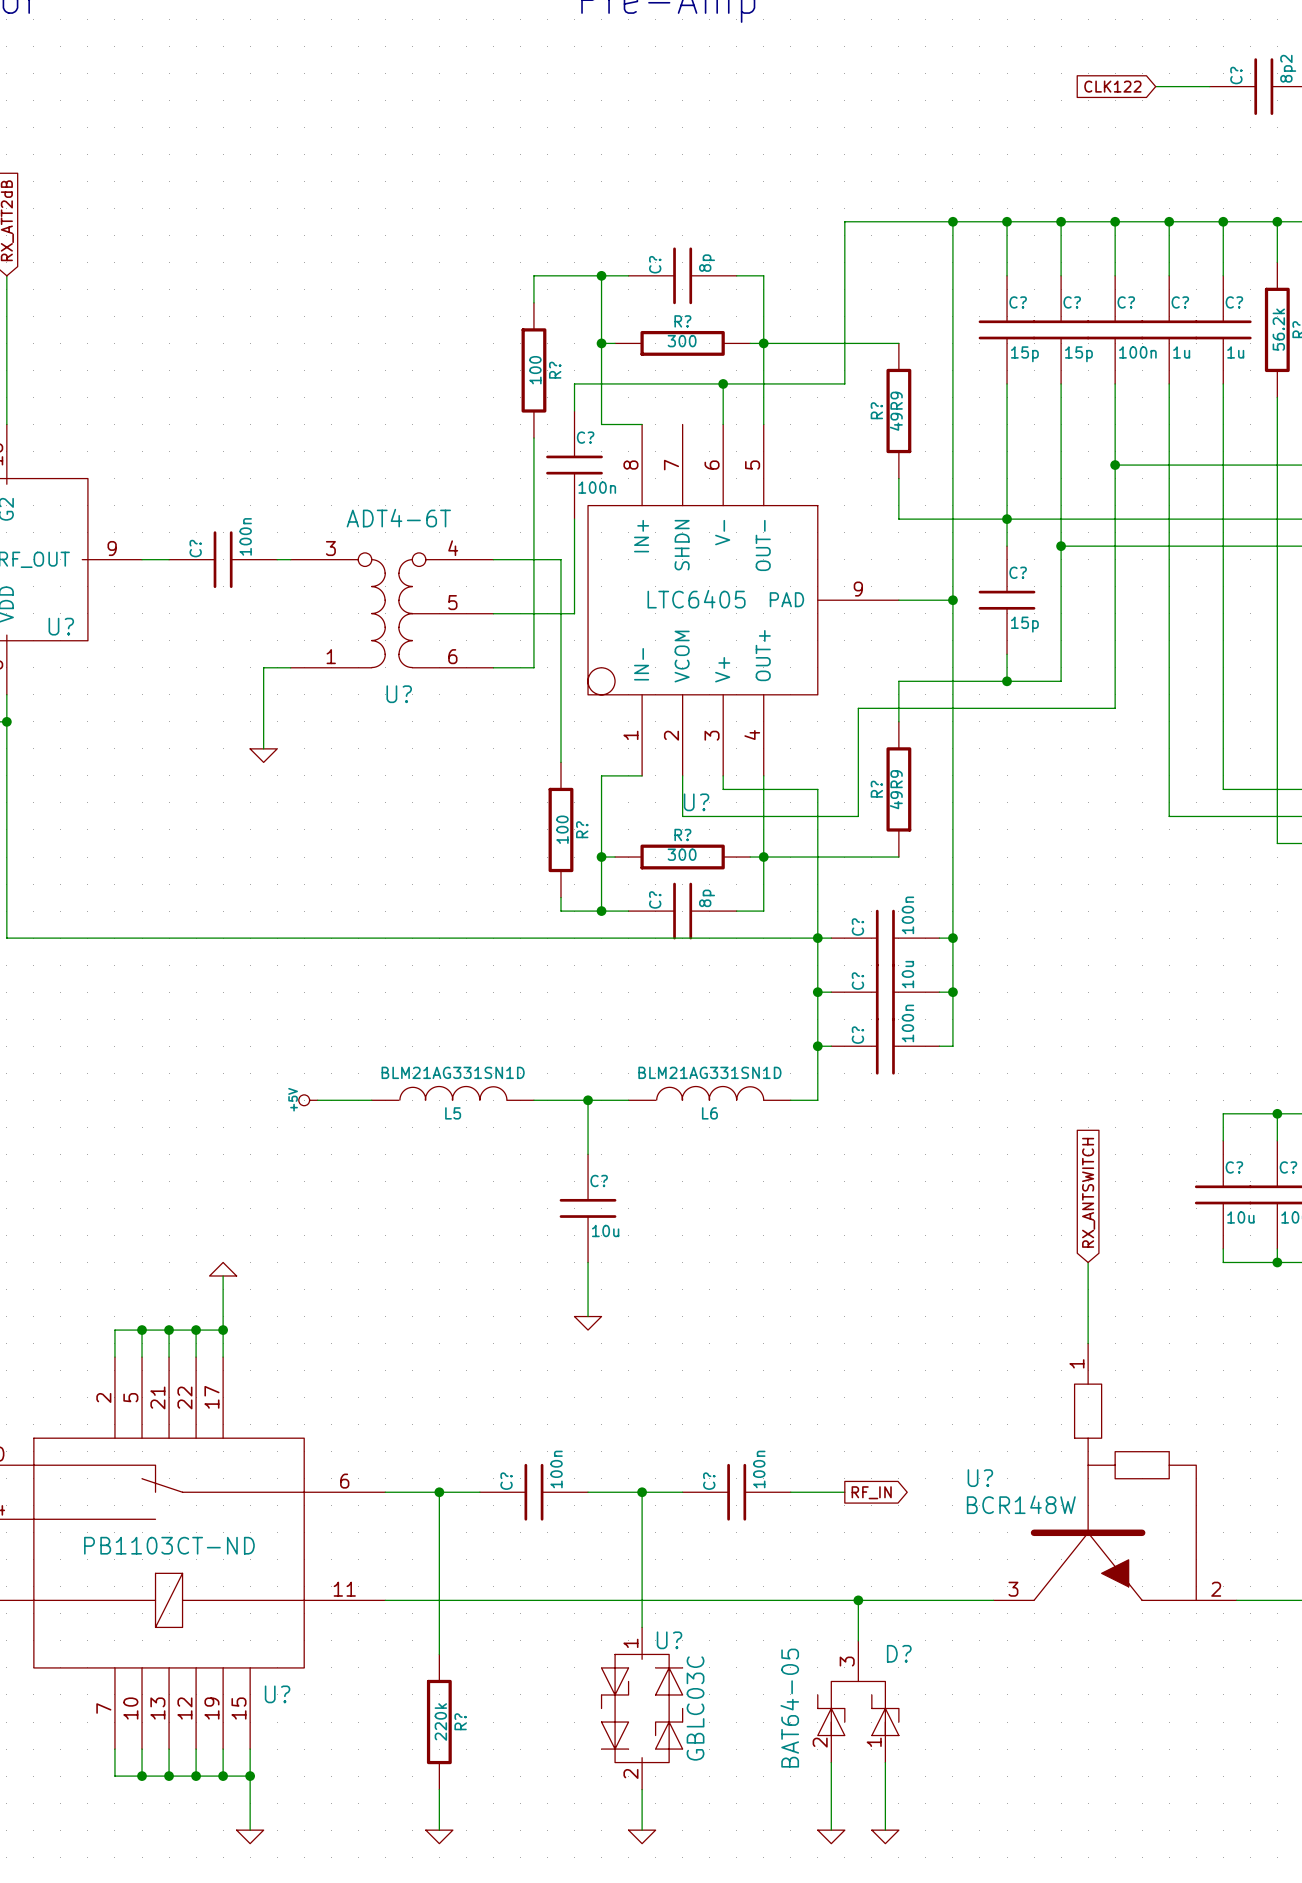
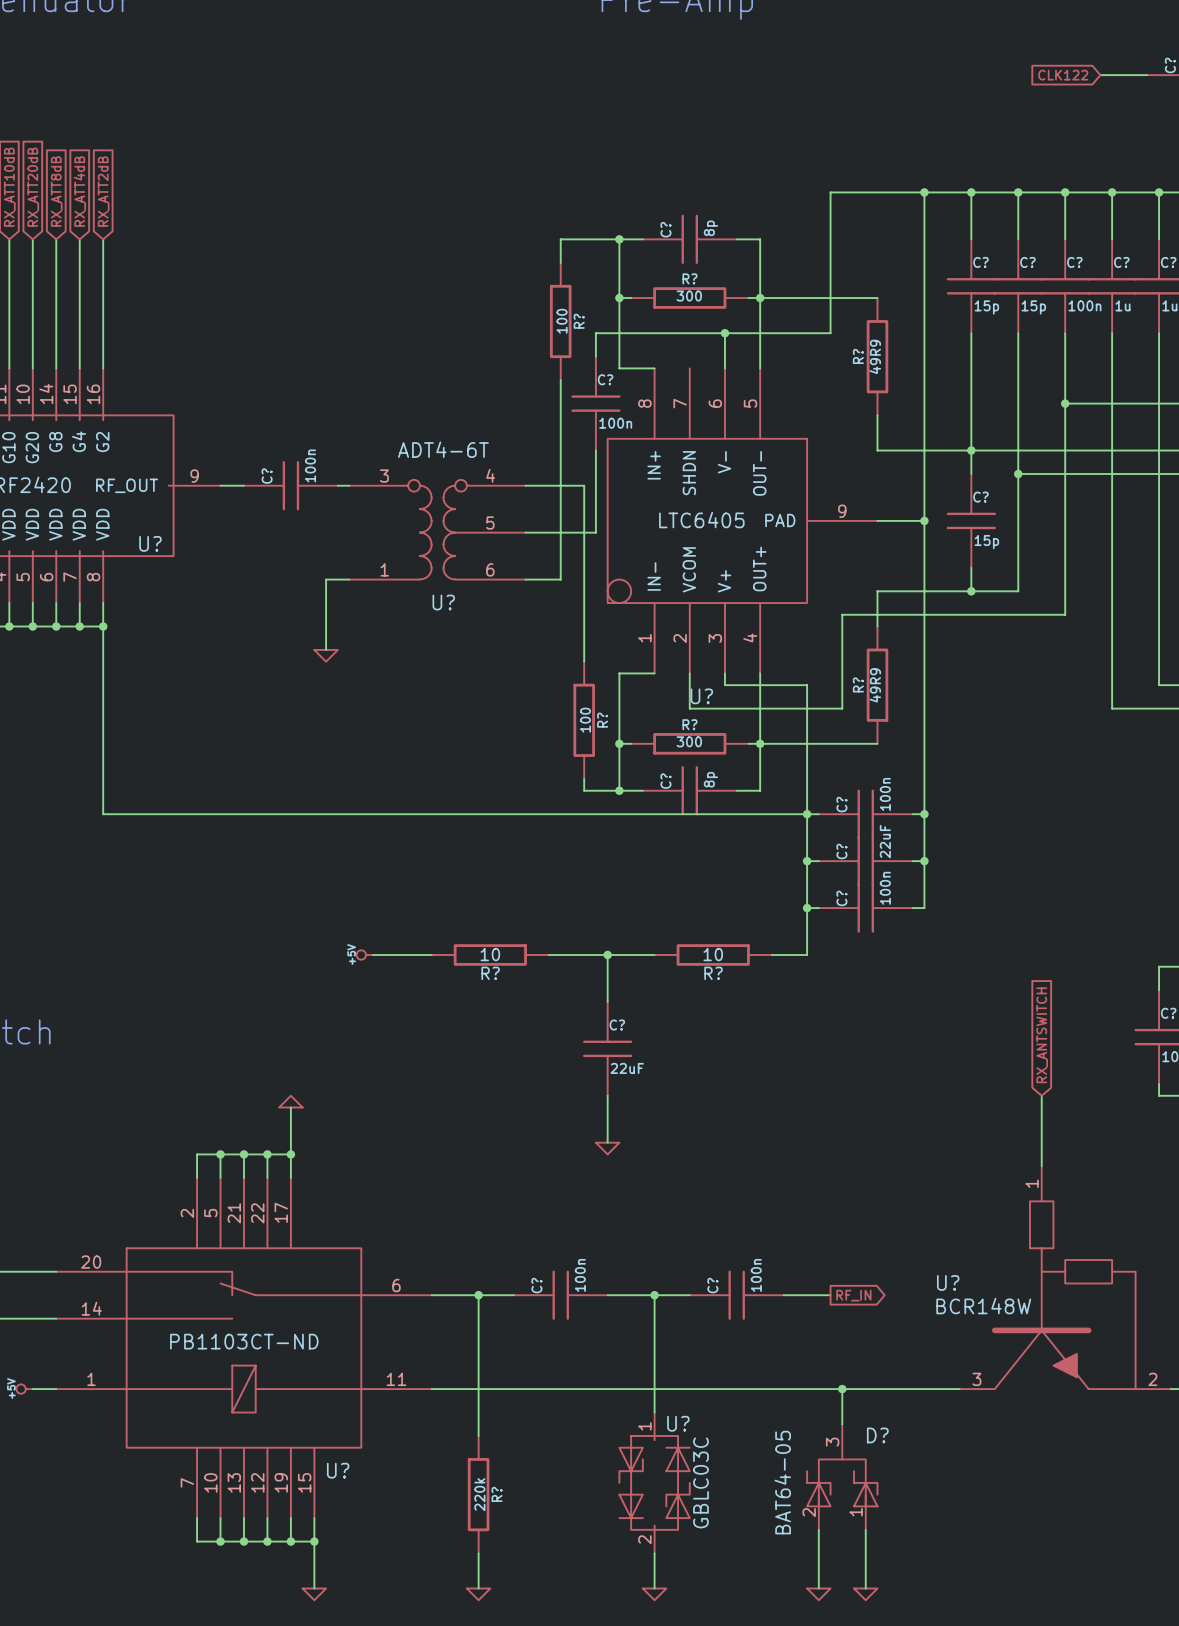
C? value: 10u (907, 974) -> 22uF (885, 841)
L5: BLM21AG331SN1D (452, 1093) -> none
L6: BLM21AG331SN1D (709, 1093) -> none
R?: none -> 10 (490, 954)
R?: none -> 10 (713, 954)
C? value: 10u (605, 1230) -> 22uF (627, 1068)

